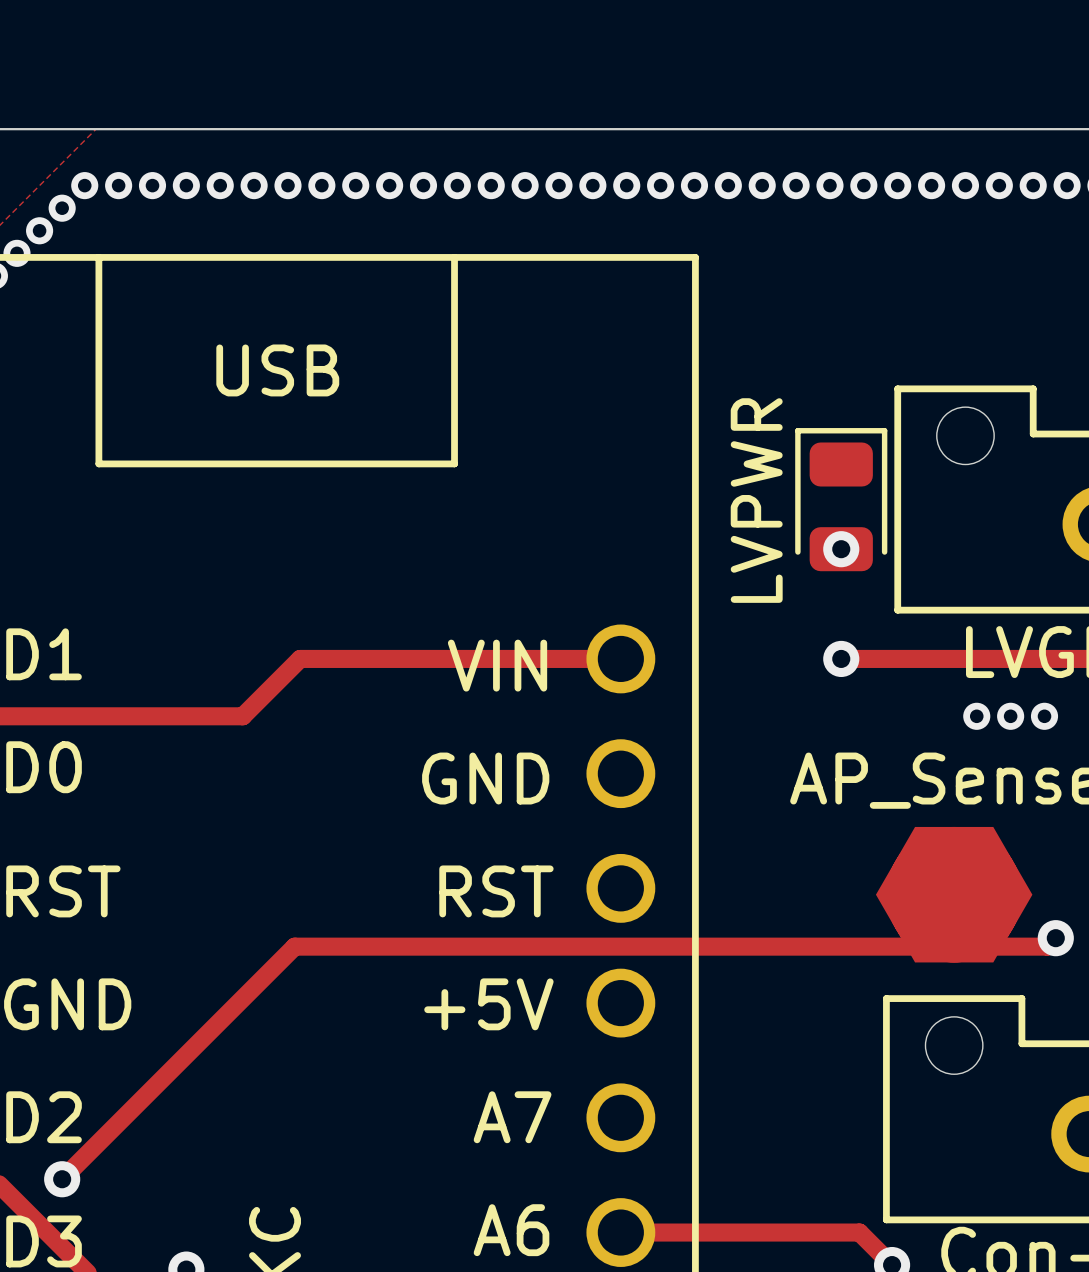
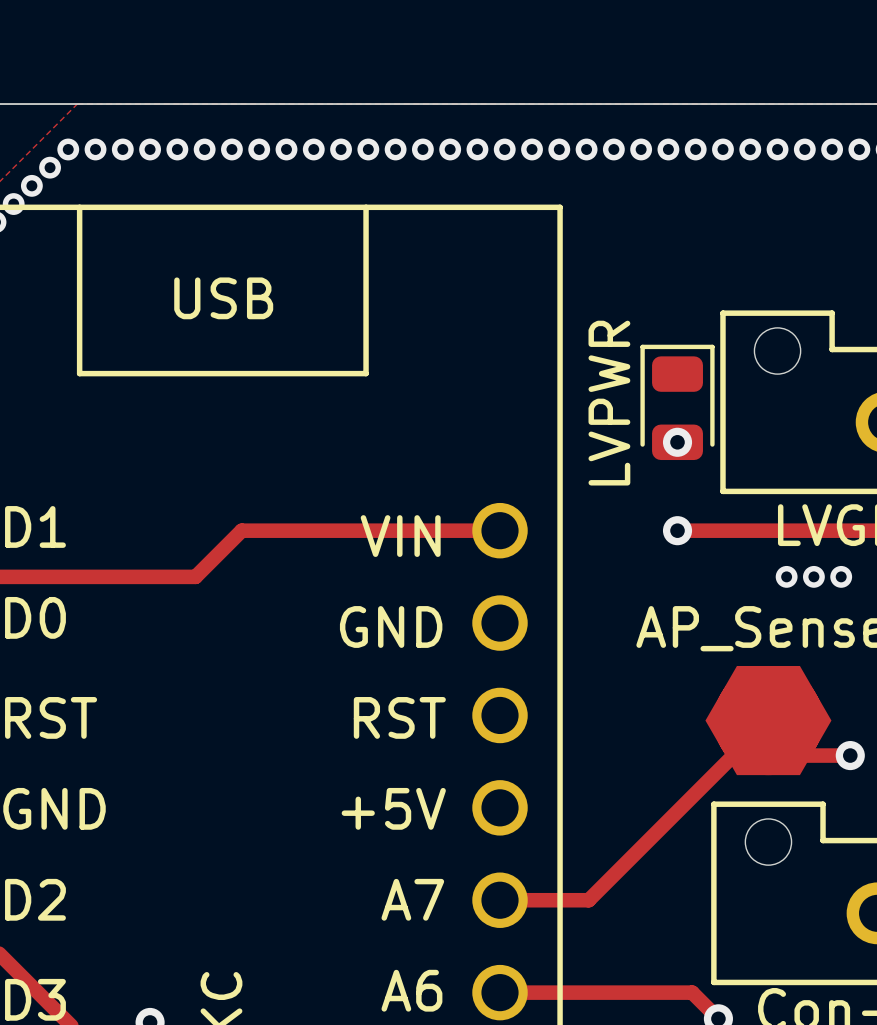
track: (1055, 938) (1047, 946) (294, 946) (62, 1179) -> (850, 755) (803, 755) (768, 720) (588, 900) (500, 900)
via: (62, 1179) -> none

